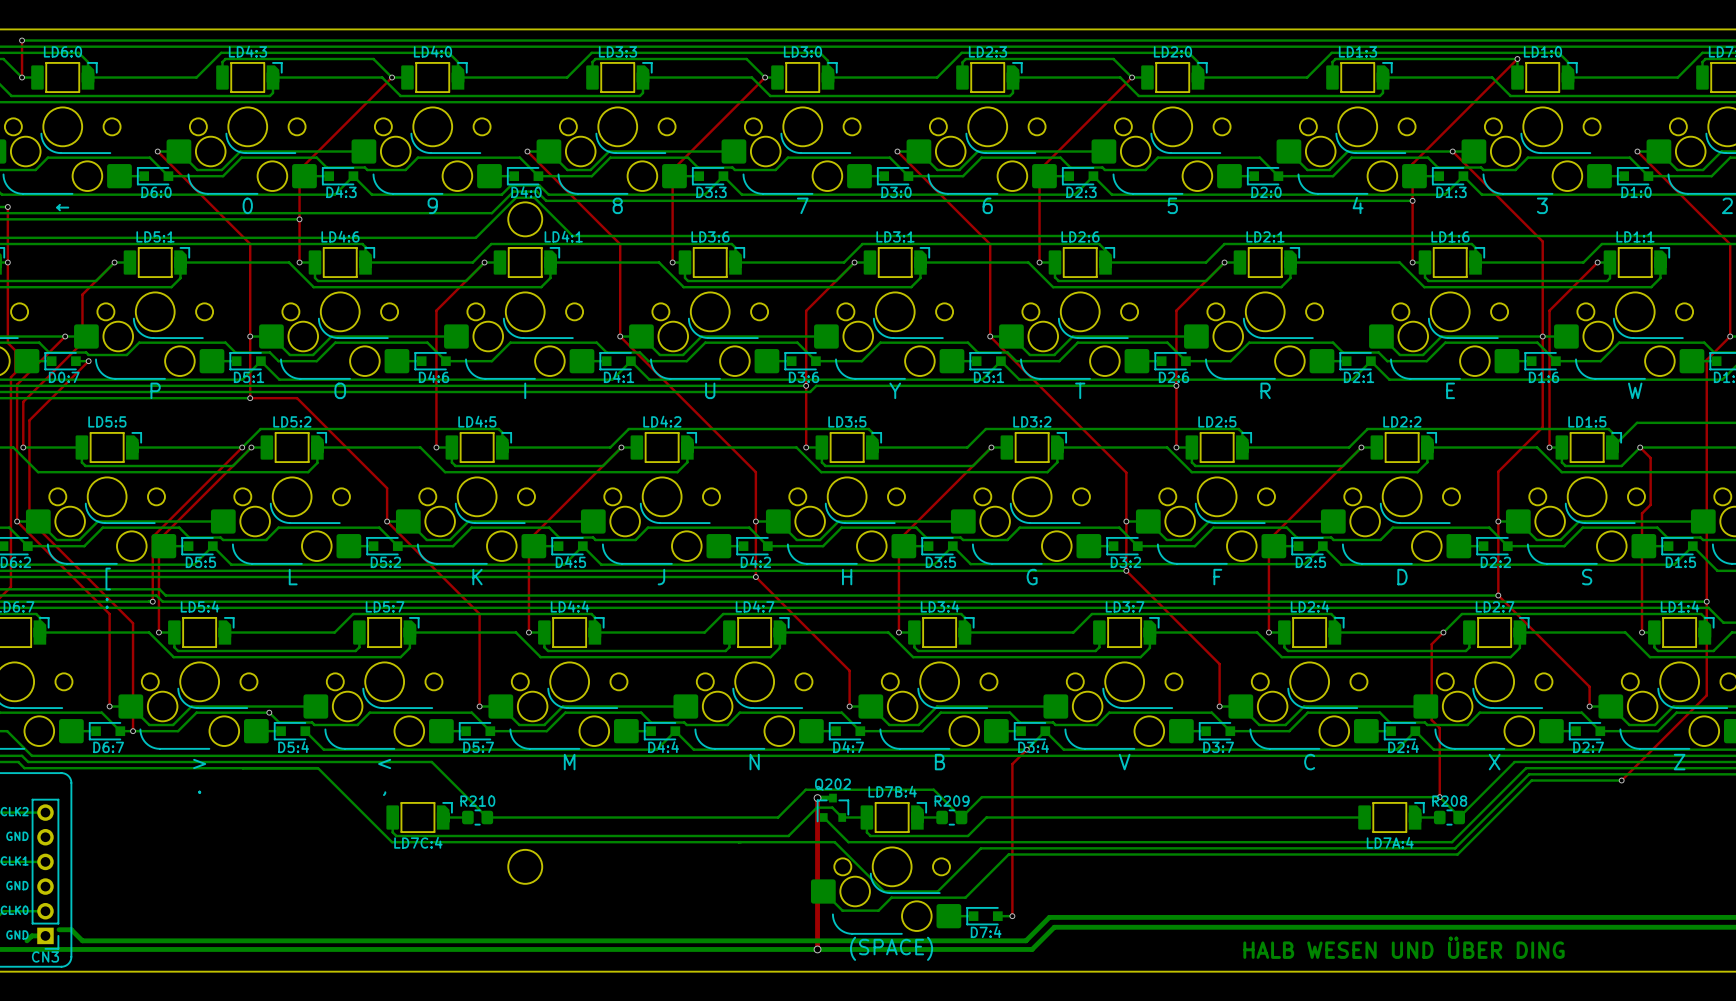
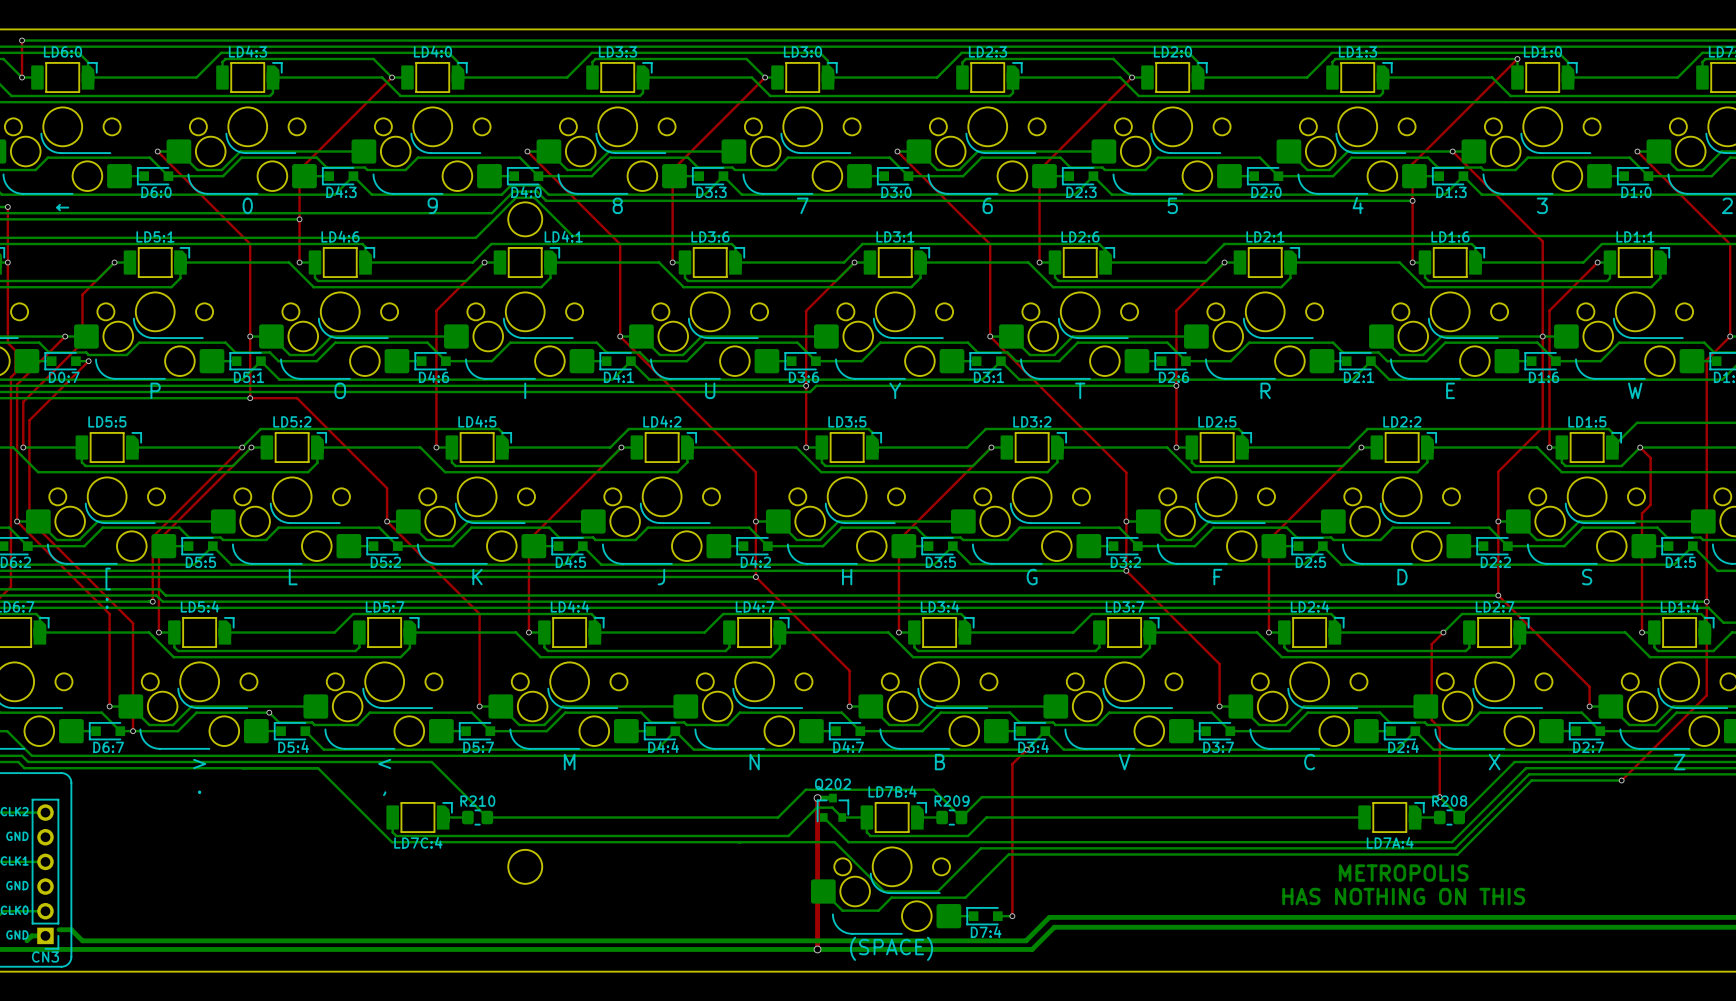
text: none -> METROPOLIS (1403, 873)
text: none -> HAS NOTHING ON THIS (1403, 896)
text: HALB WESEN UND ÜBER DING (1404, 947) -> none

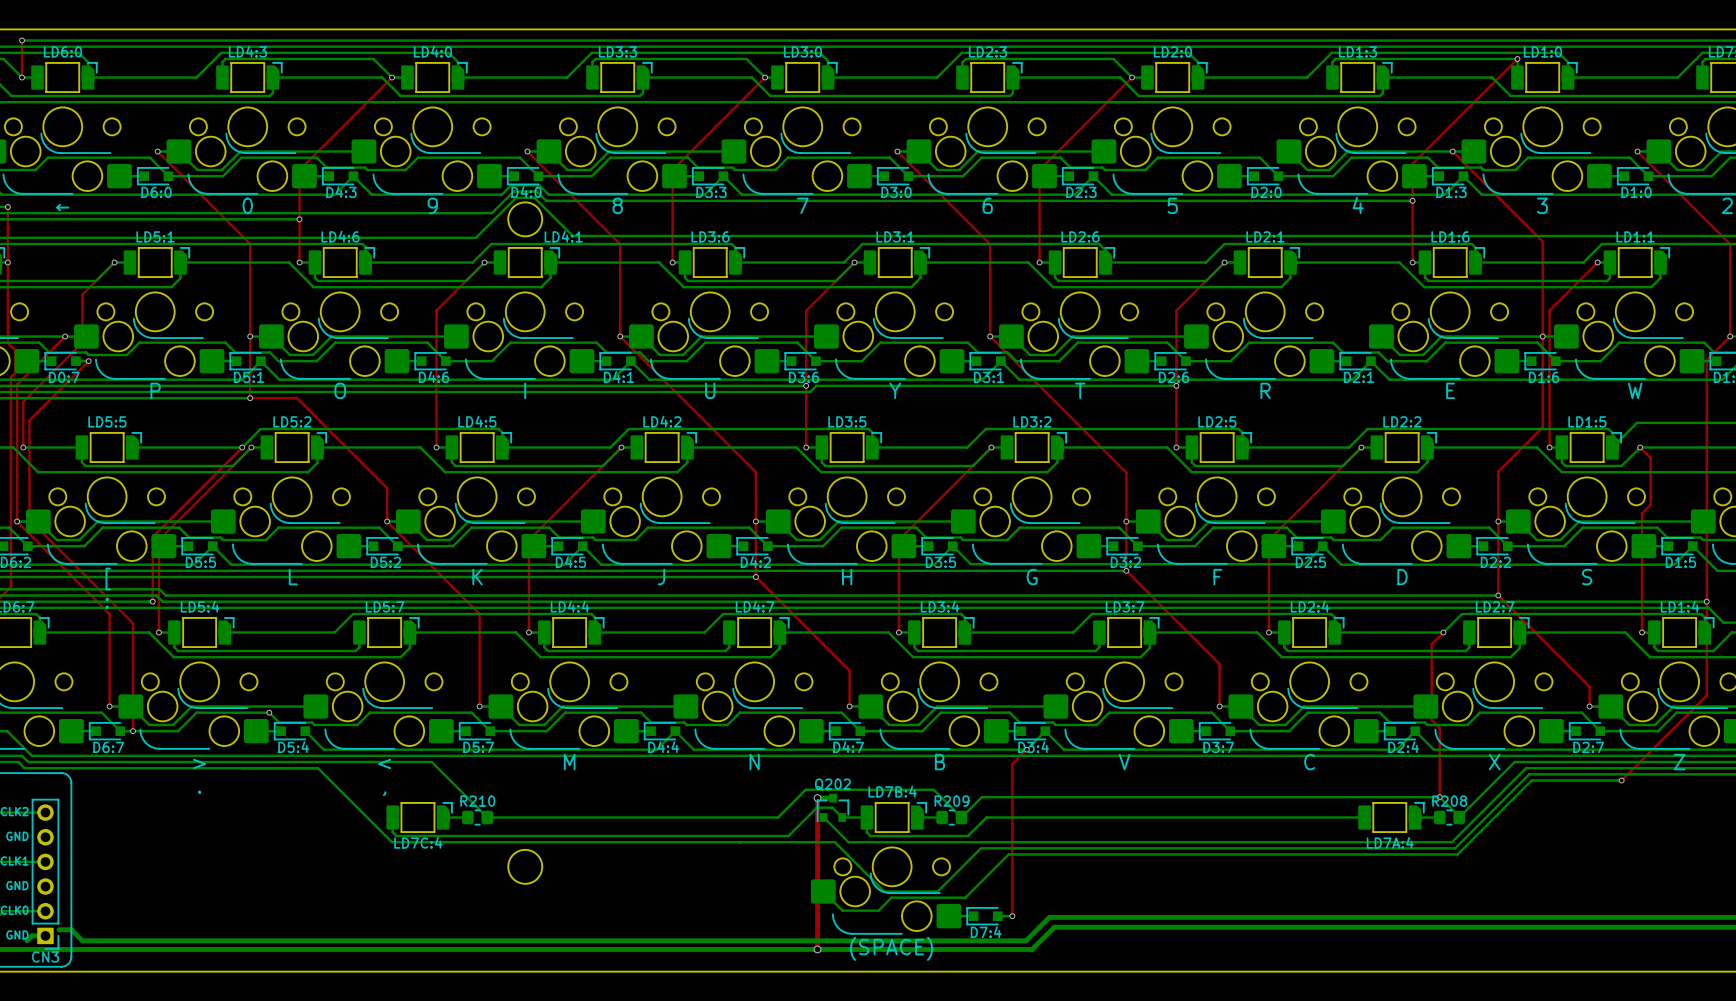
text: METROPOLIS (1403, 873) -> none
text: HAS NOTHING ON THIS (1403, 896) -> none

